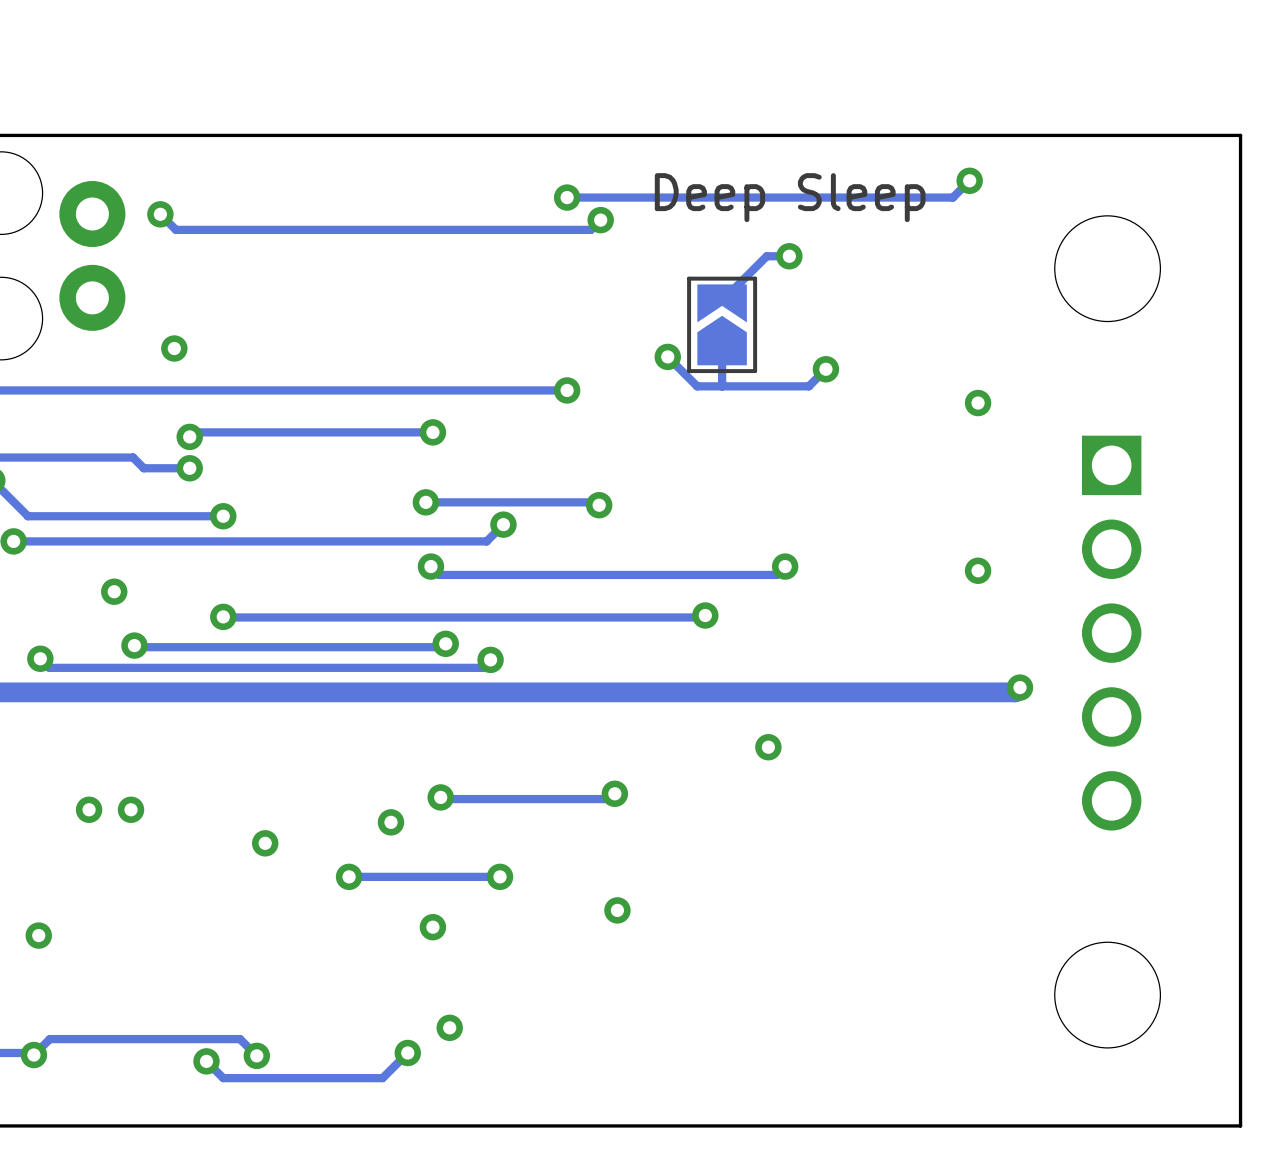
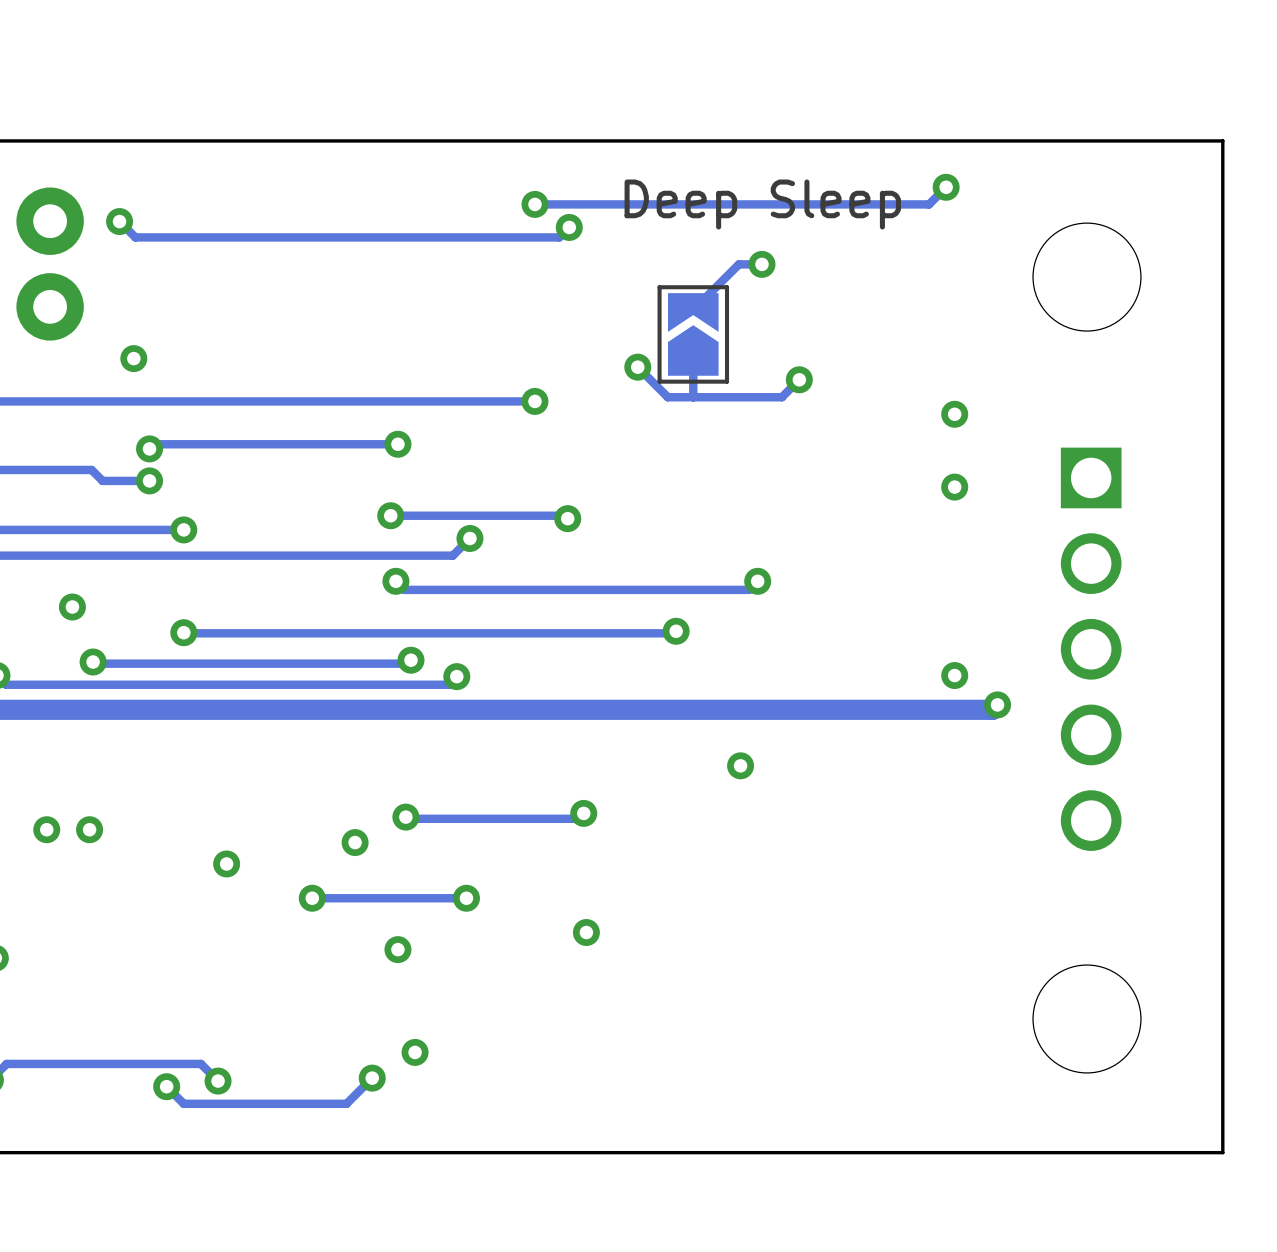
via: none -> (954, 487)
via: (978, 570) -> none
via: none -> (954, 675)

